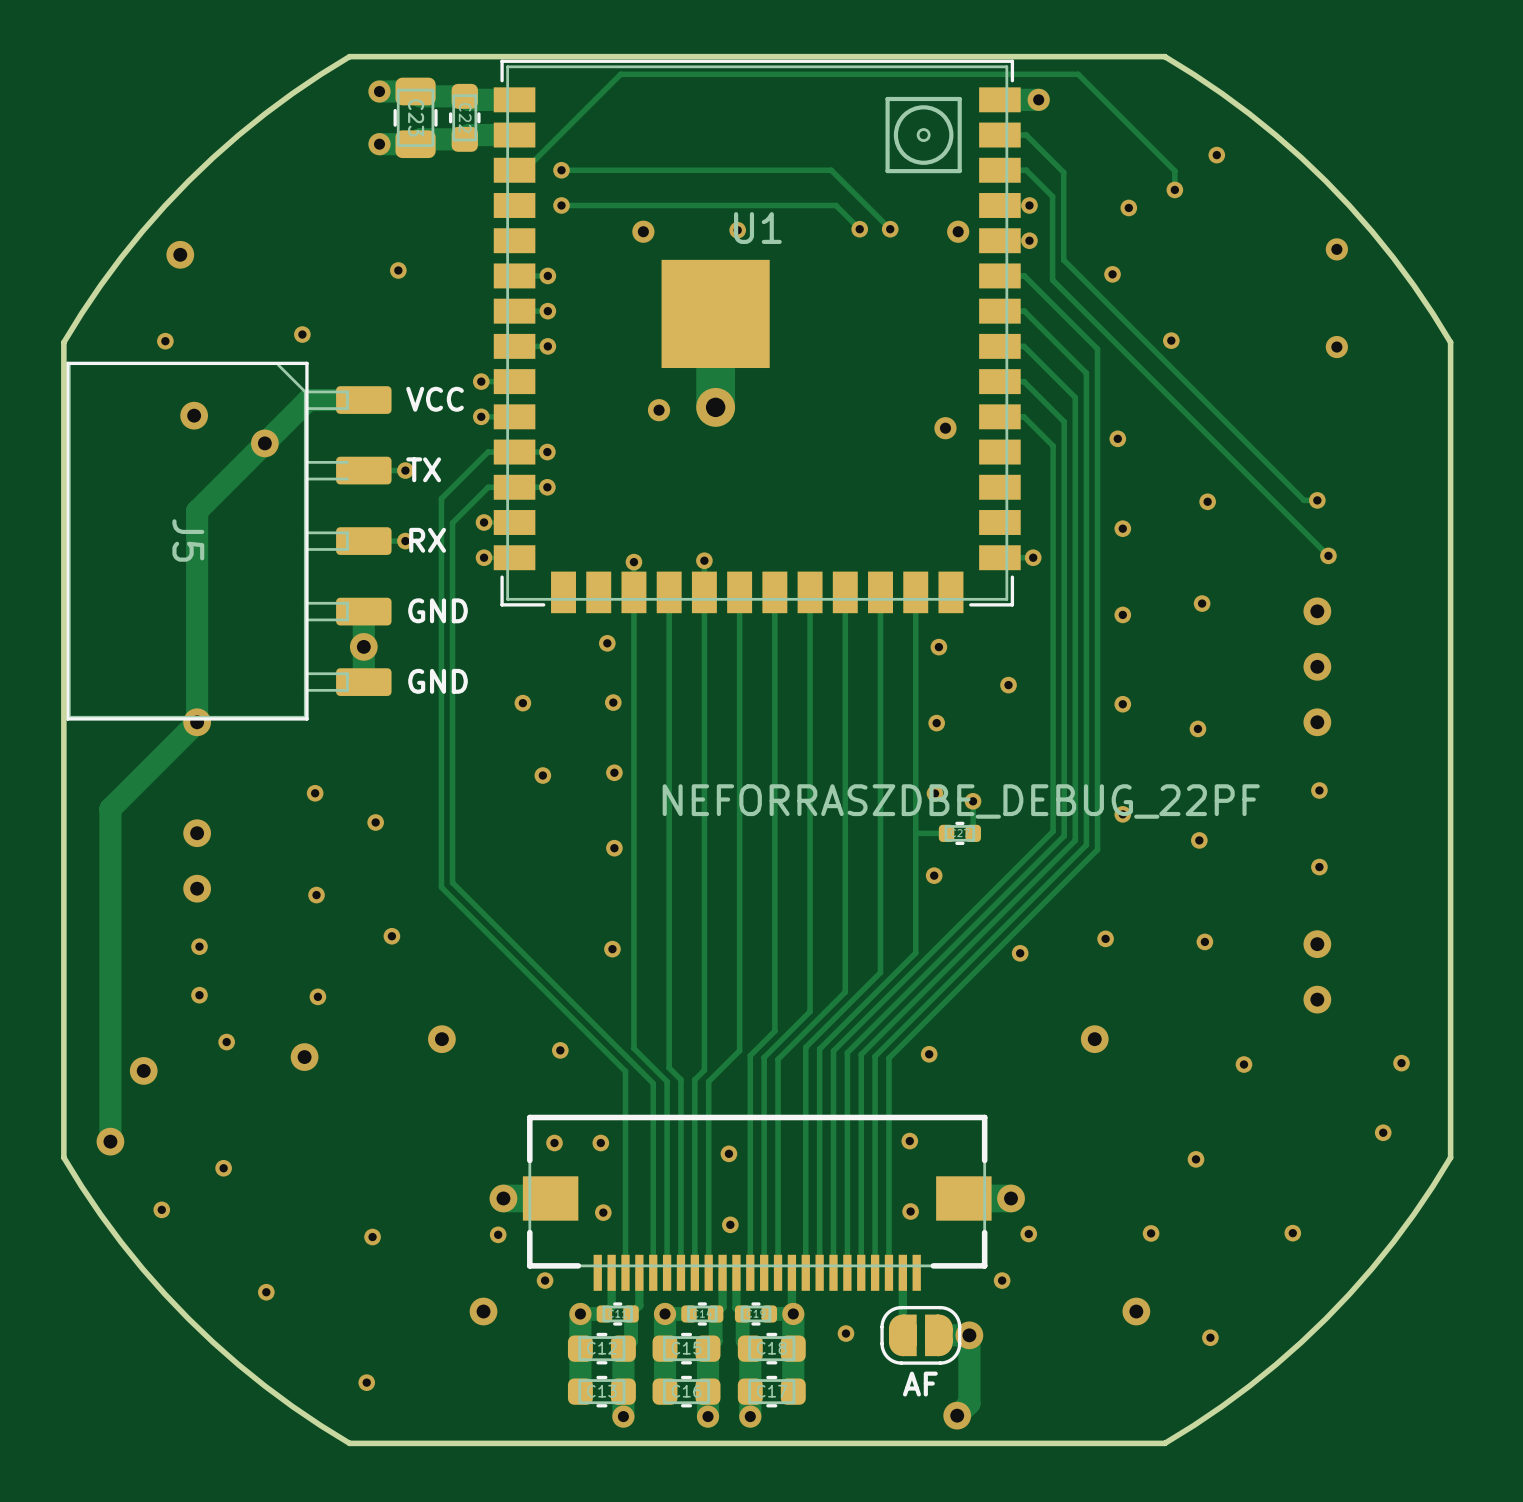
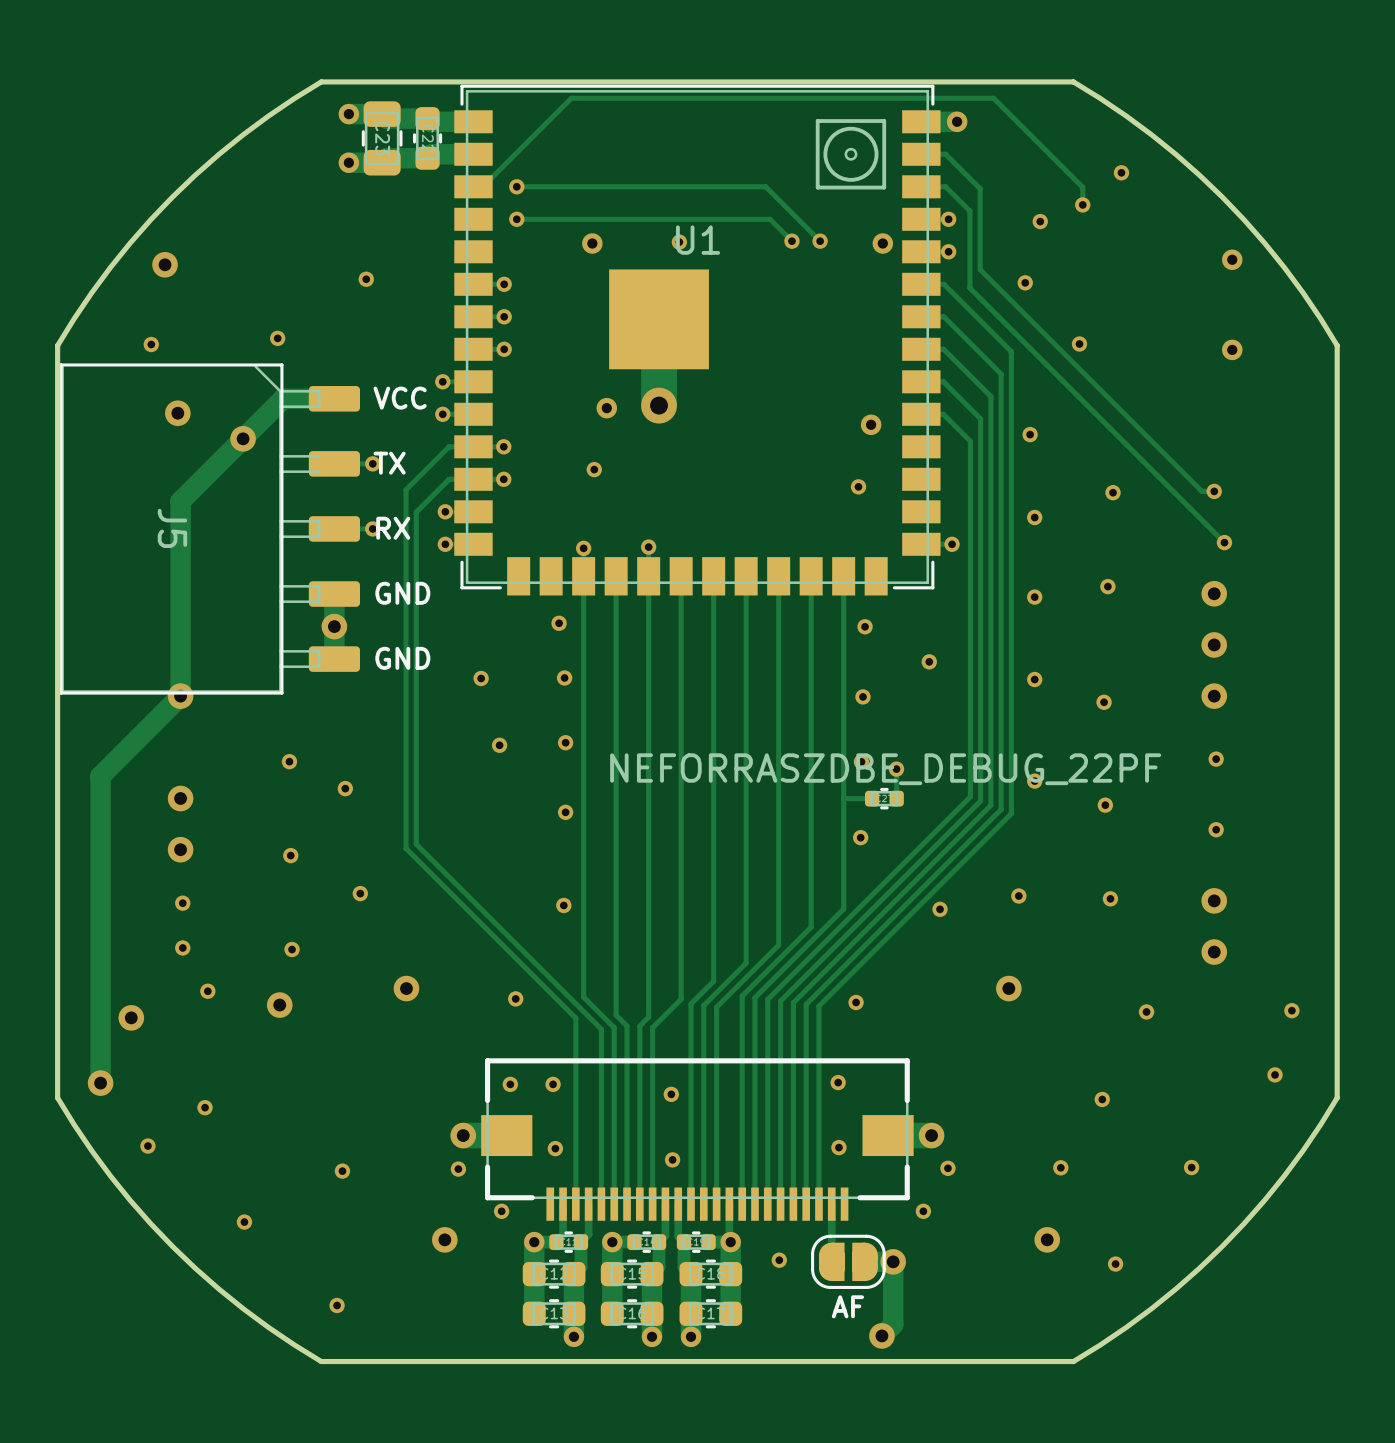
via: none -> (594, 469)
via: none -> (858, 486)

